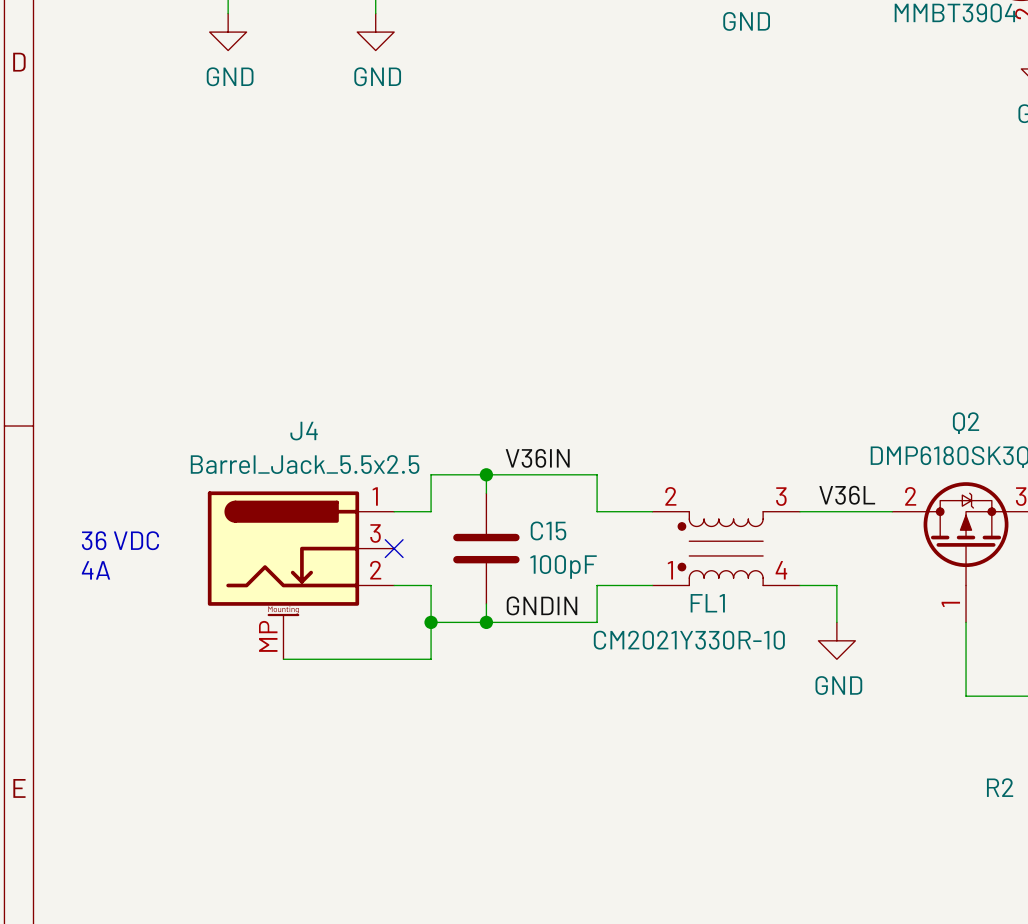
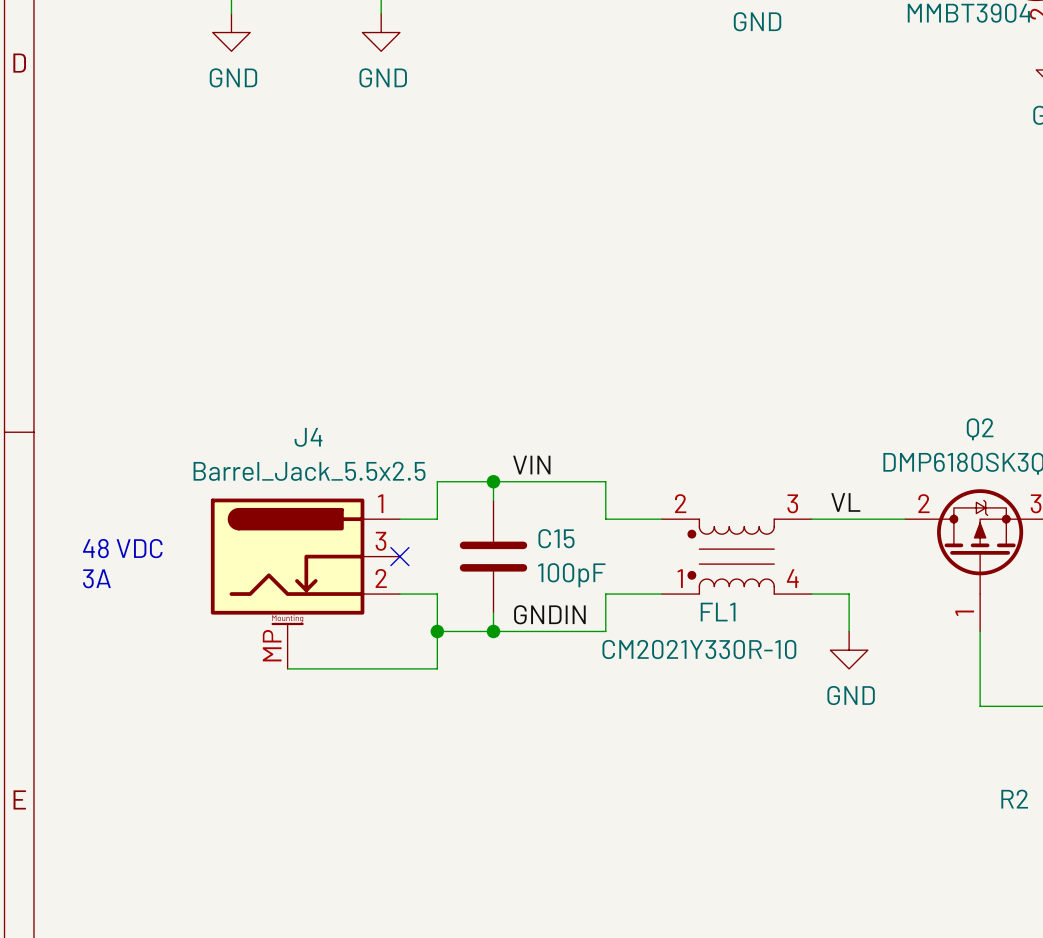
label: V36IN (537, 458) -> VIN (531, 465)
label: V36L (847, 495) -> VL (845, 502)
text: 36 VDC (120, 540) -> 48 VDC (122, 548)
text: 4A (96, 570) -> 3A (96, 578)

